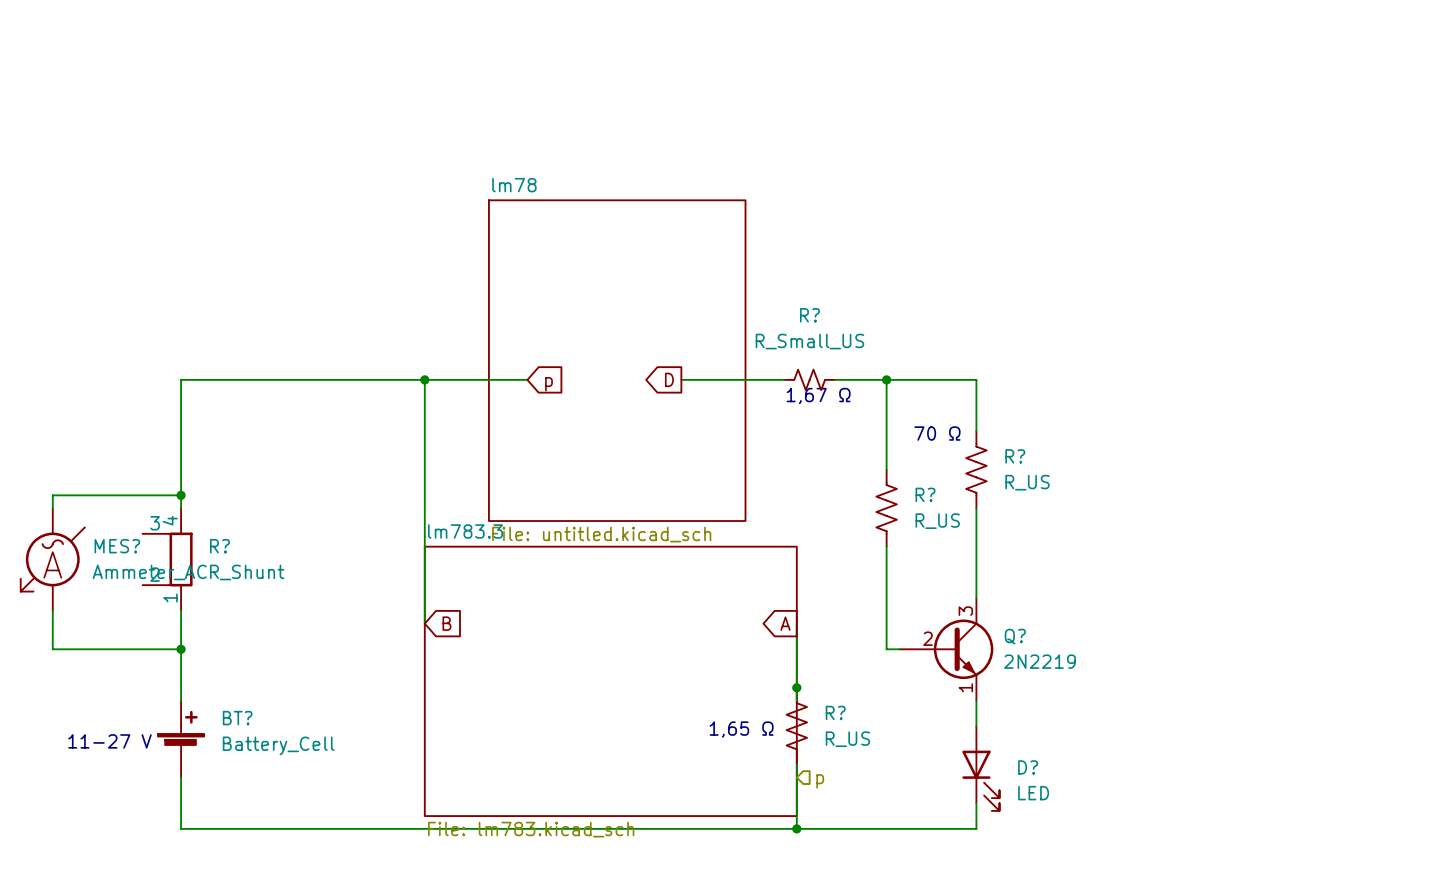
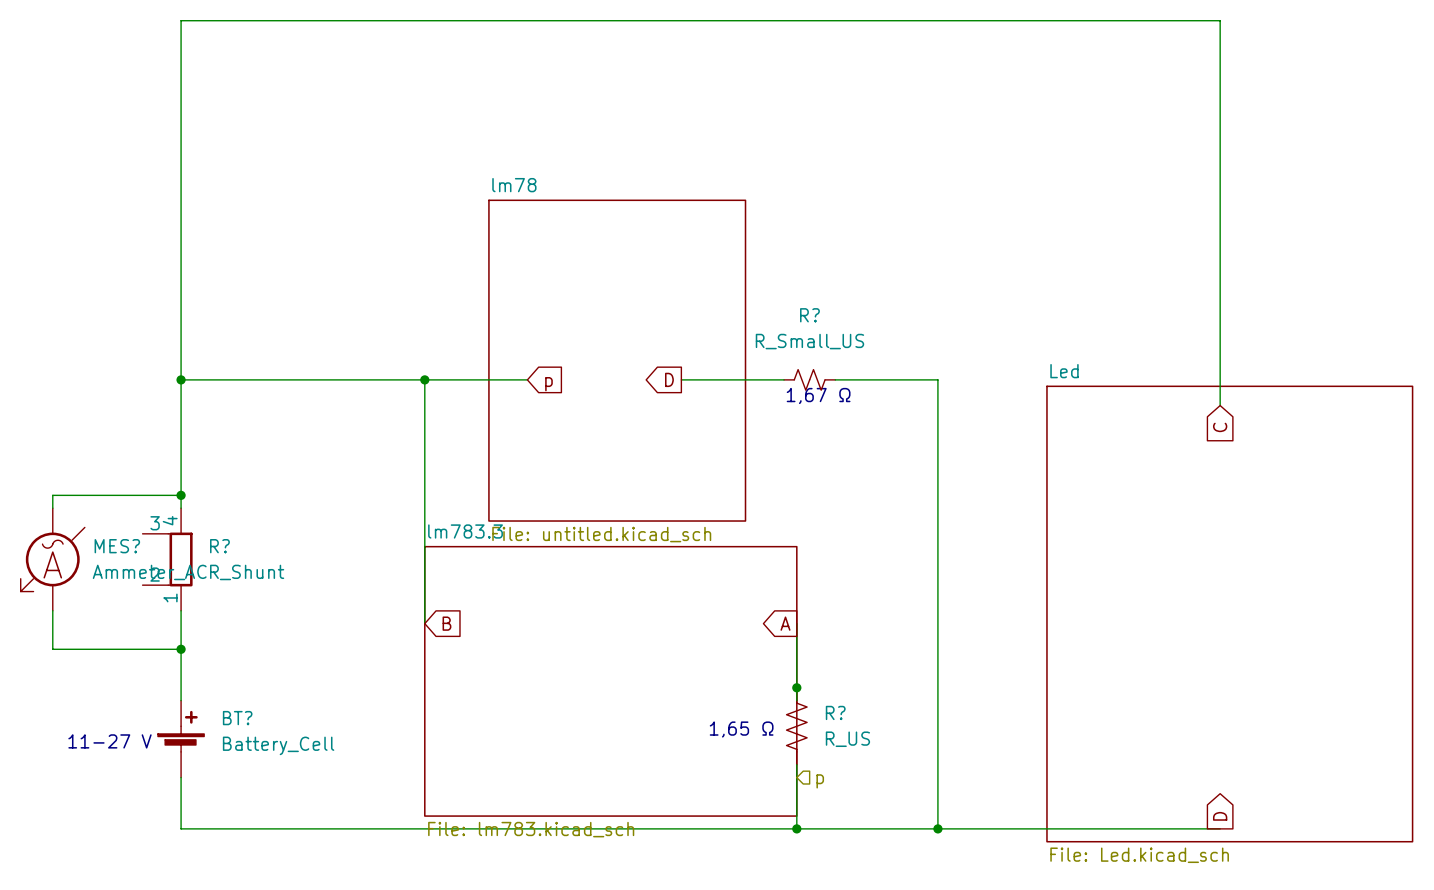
wire: none -> (181, 379) (181, 20) (1220, 20) (1220, 405)
junction: none -> (181, 379)
wire: (886, 379) (886, 469) -> none
junction: (886, 379) -> none
wire: (937, 379) (976, 379) (976, 431) -> (937, 379) (937, 828)
global label: none -> C (1220, 427)
text: 70 Ω (937, 433) -> none
R?: R_US (976, 469) -> none
R?: R_US (886, 508) -> none
wire: (976, 508) (976, 597) -> none
wire: (886, 546) (886, 649) (899, 649) -> none
sheet Led: none -> File: Led.kicad_sch (1229, 614)
Q?: 2N2219 (946, 649) -> none
wire: (976, 700) (976, 726) -> none
D?: LED (980, 768) -> none
wire: (976, 803) (976, 828) -> (1220, 828) (976, 828)
global label: none -> D (1220, 816)
junction: none -> (937, 828)

